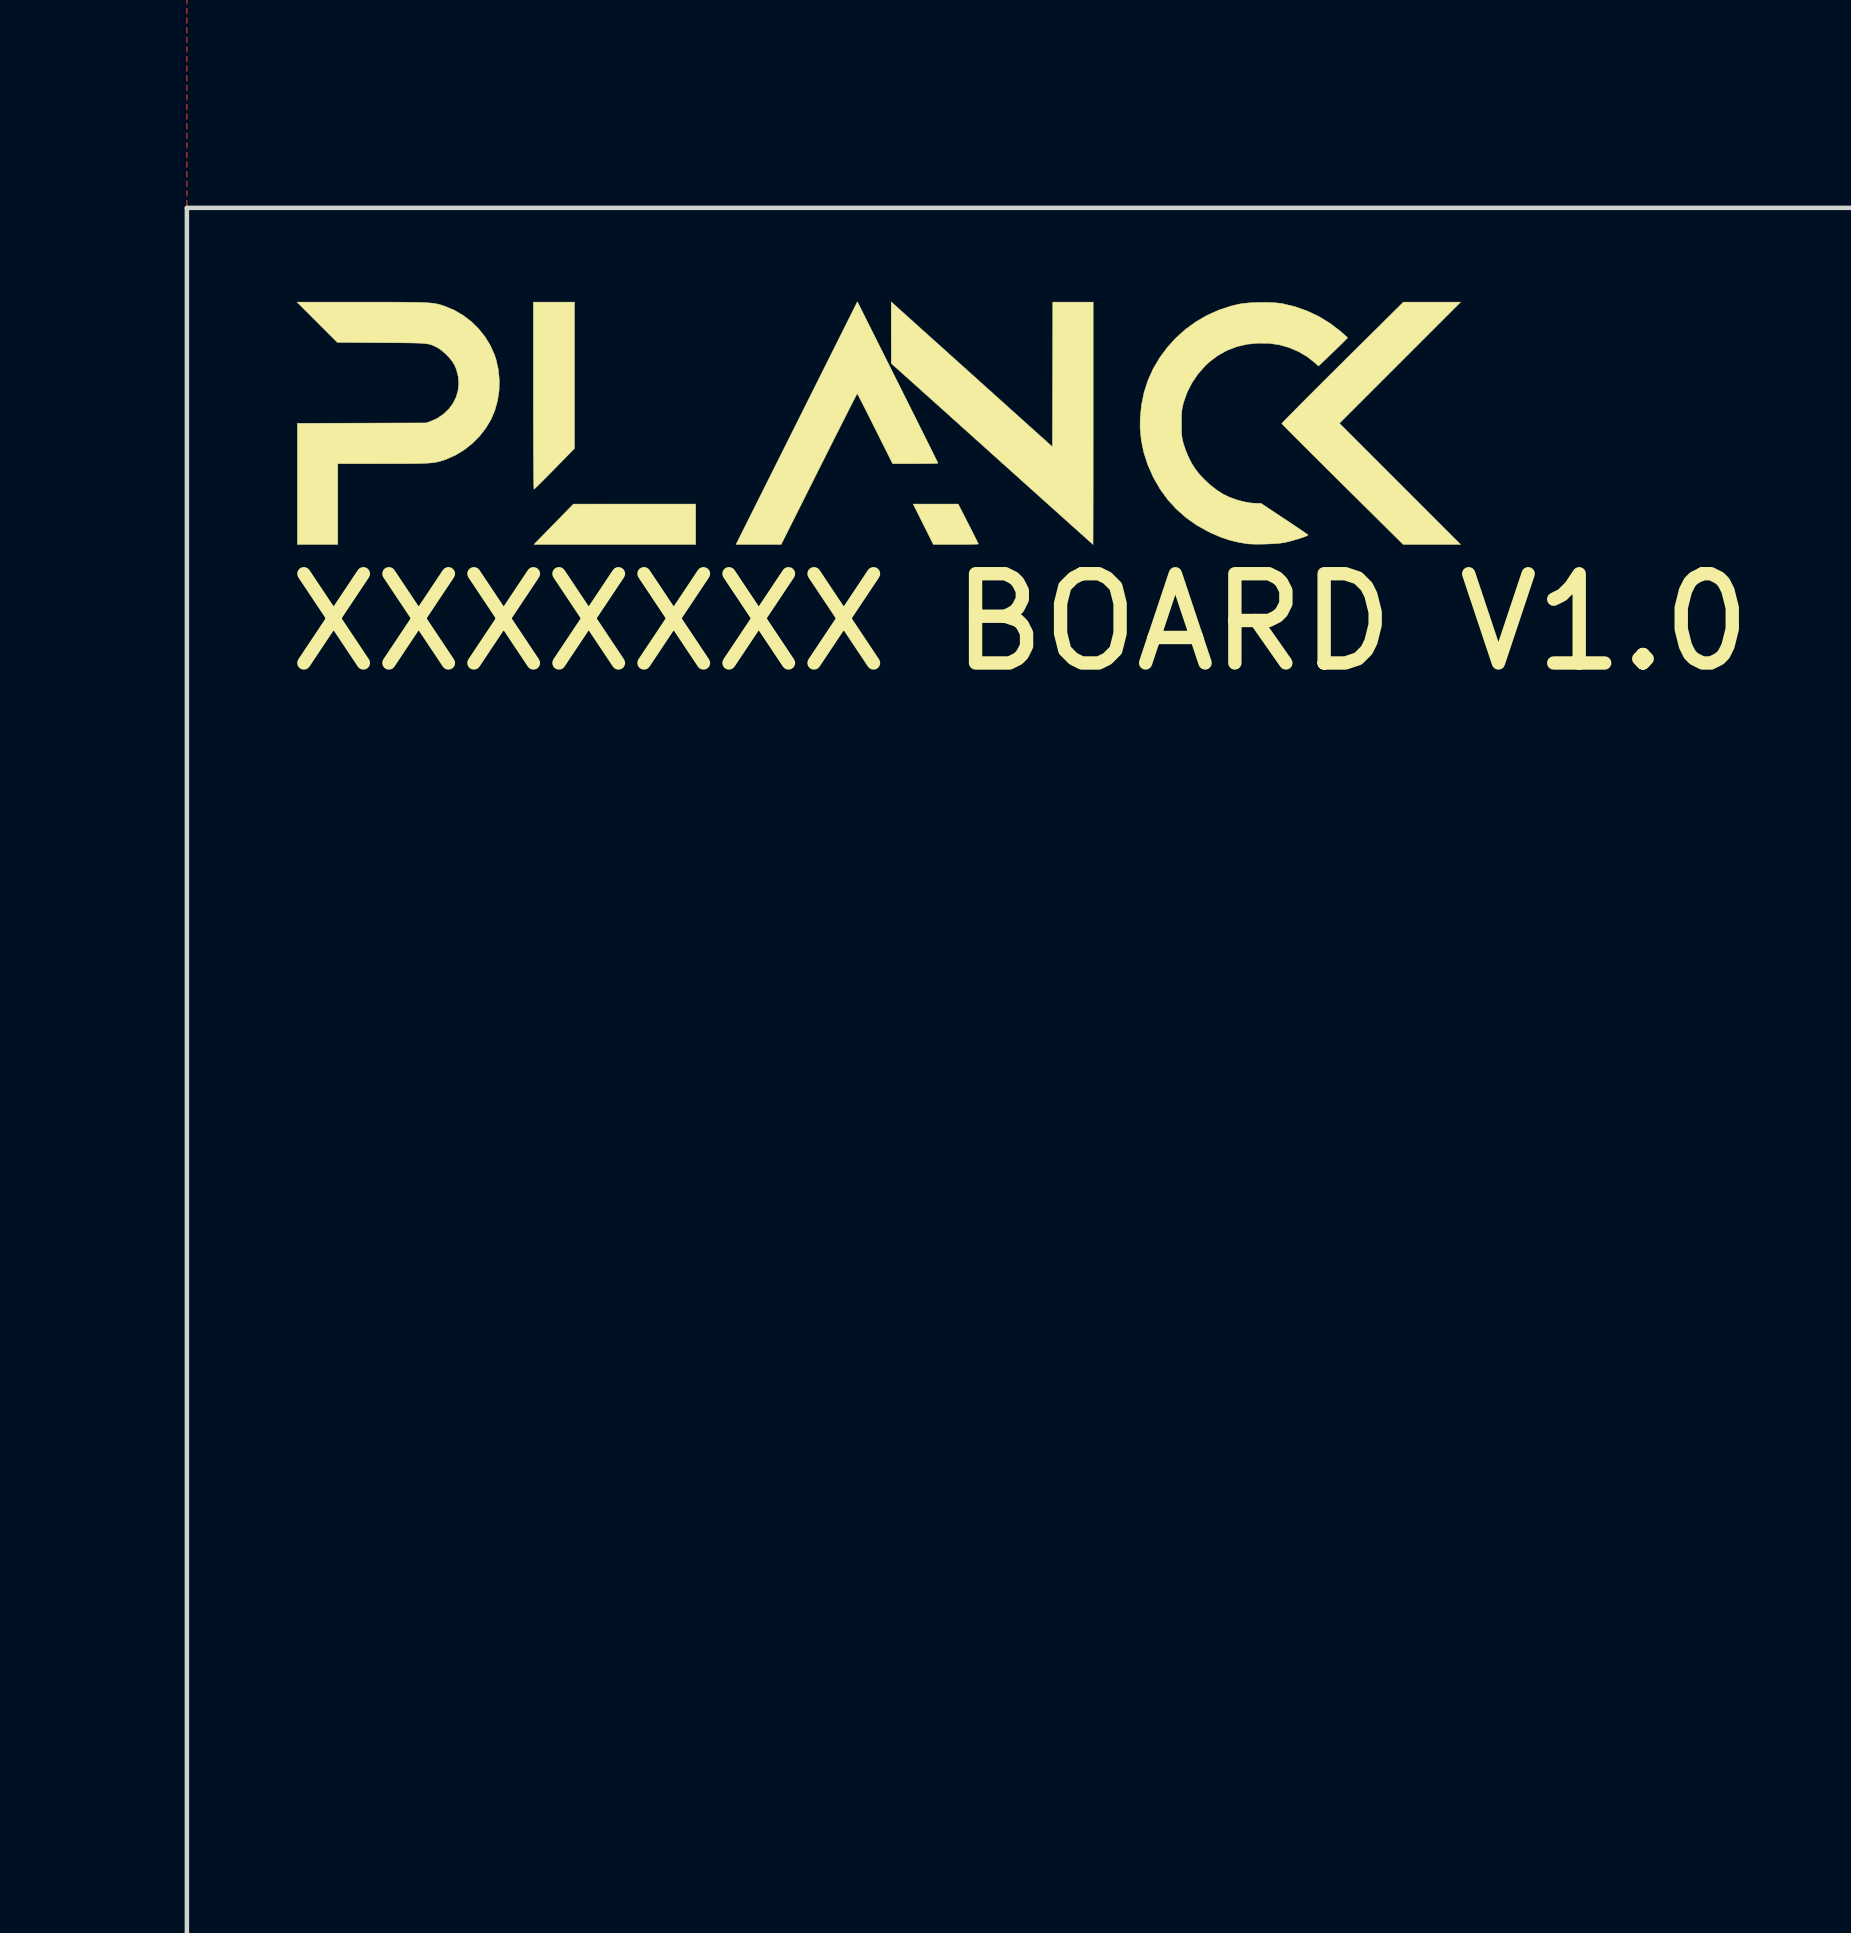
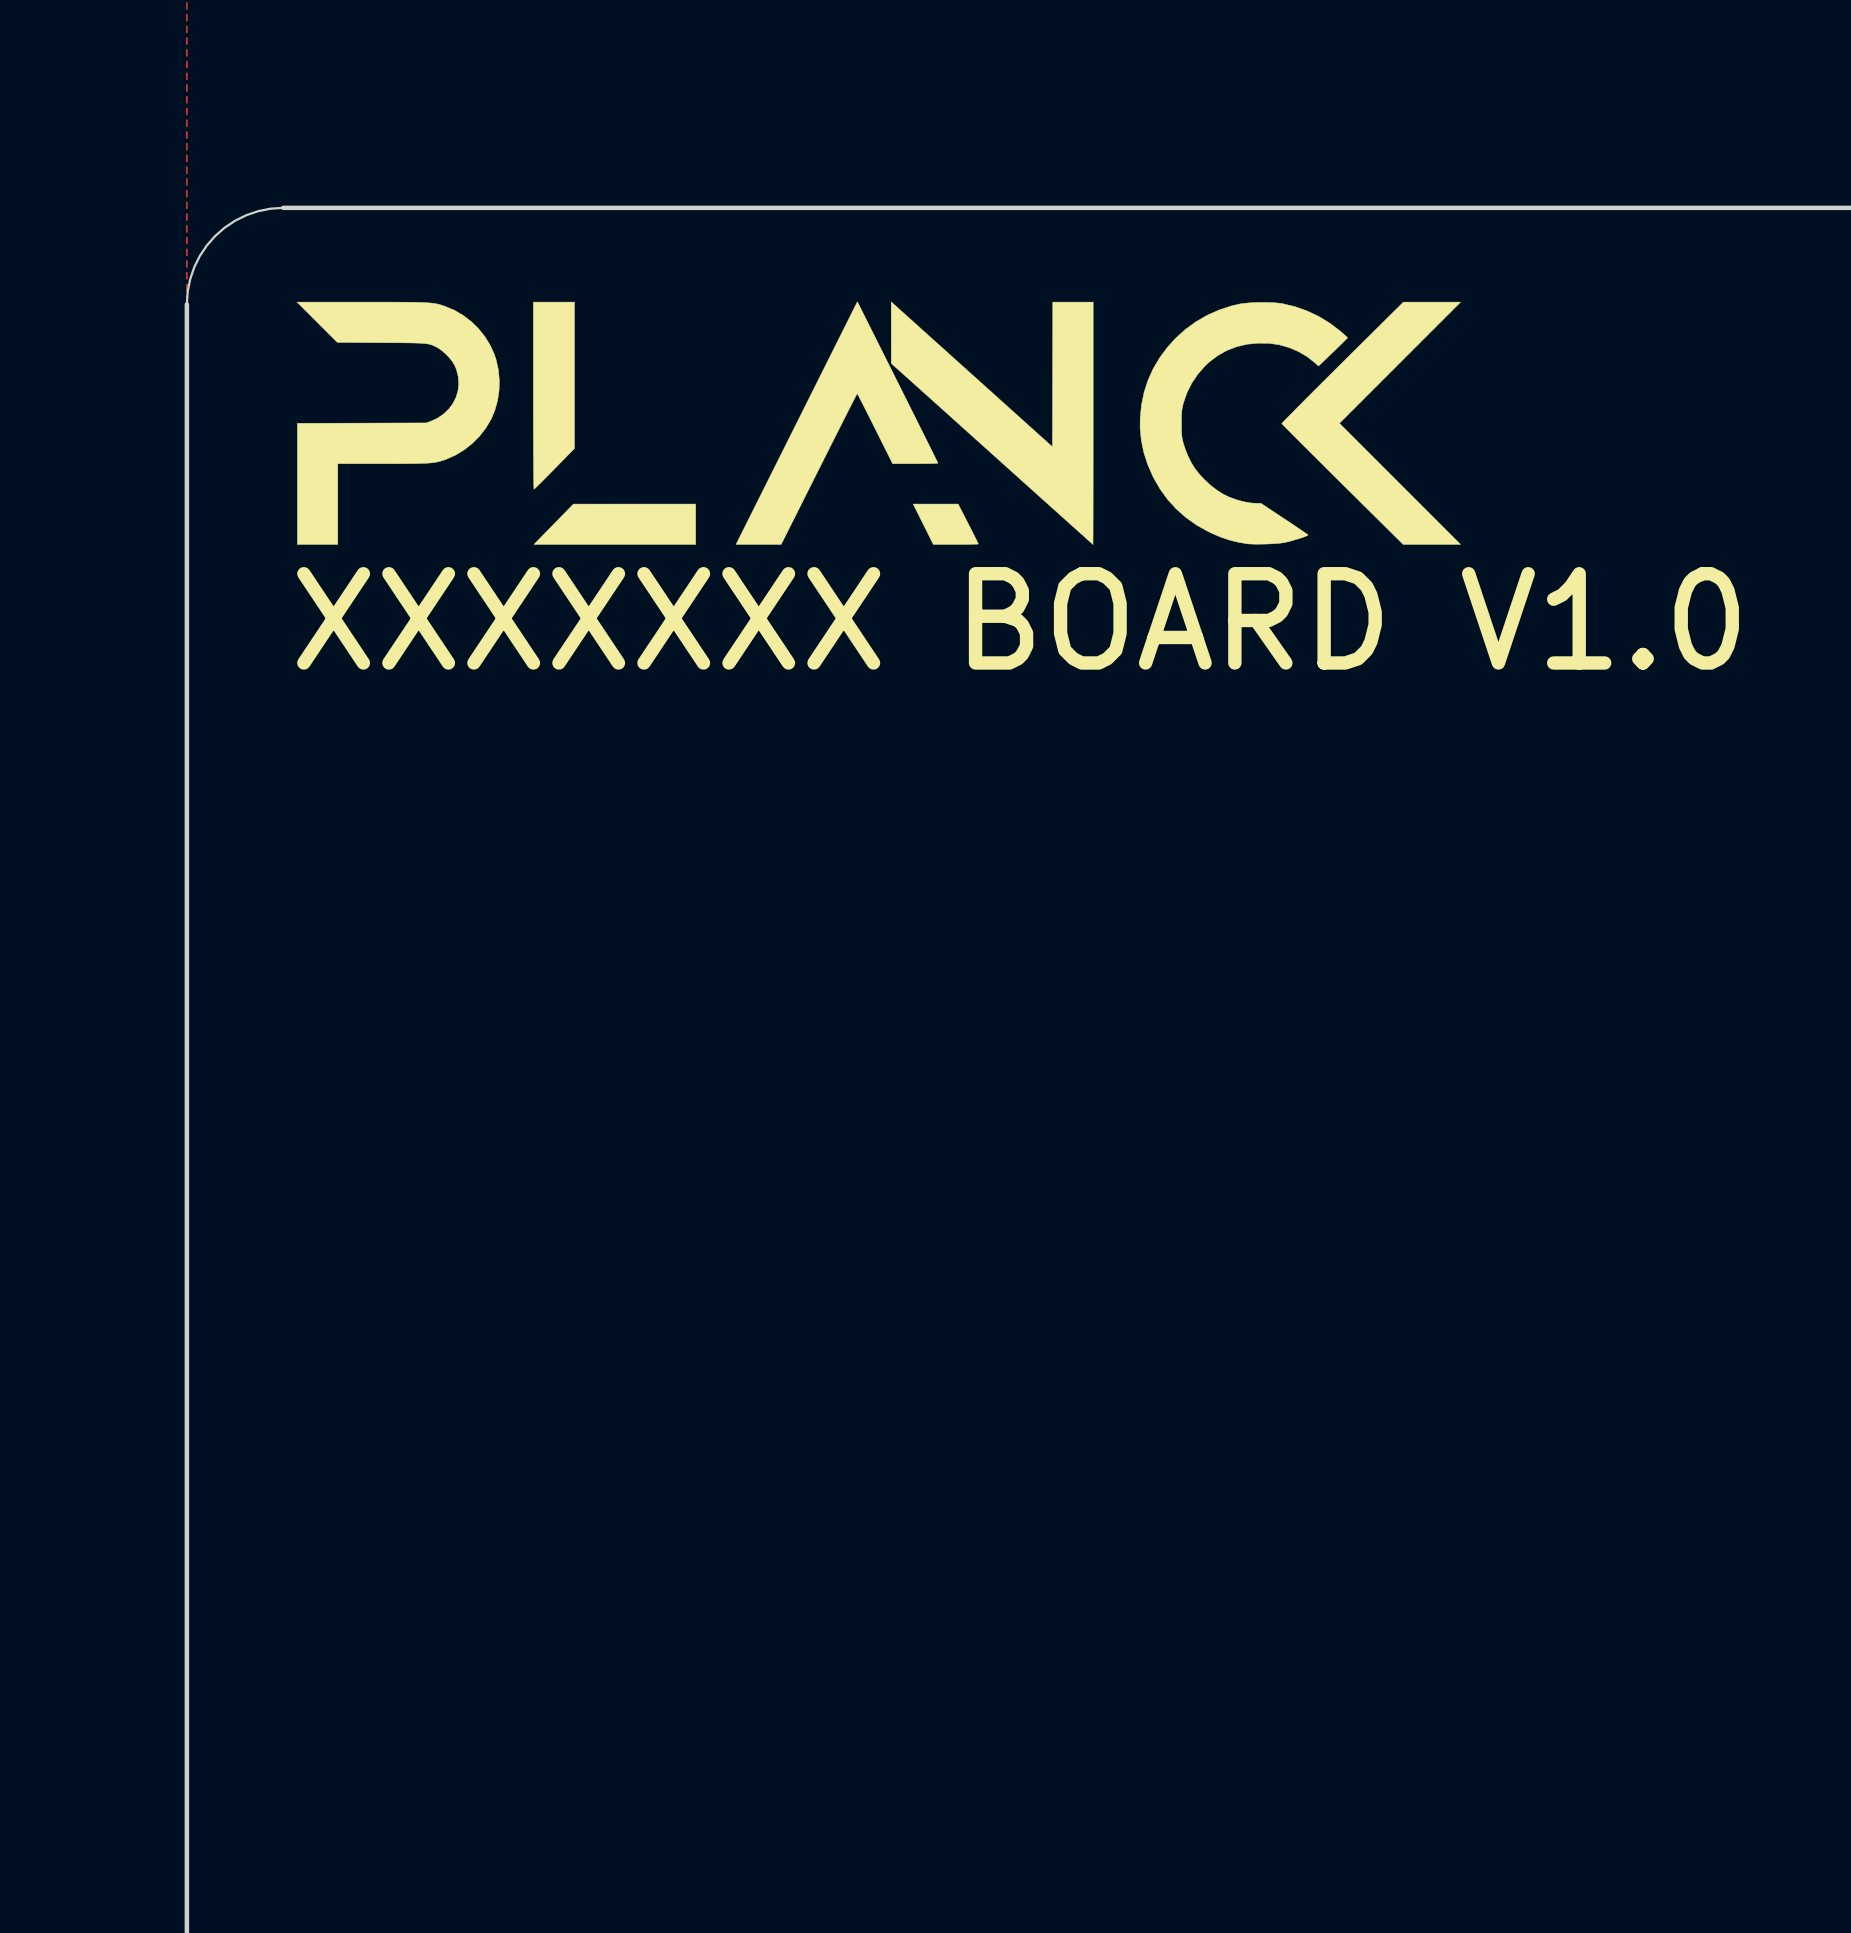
board edge: (283, 207) (186, 207) (186, 304) -> (283, 207) (270, 208) (246, 215) (235, 220) (215, 236) (199, 256) (194, 267) (187, 291) (186, 304)

